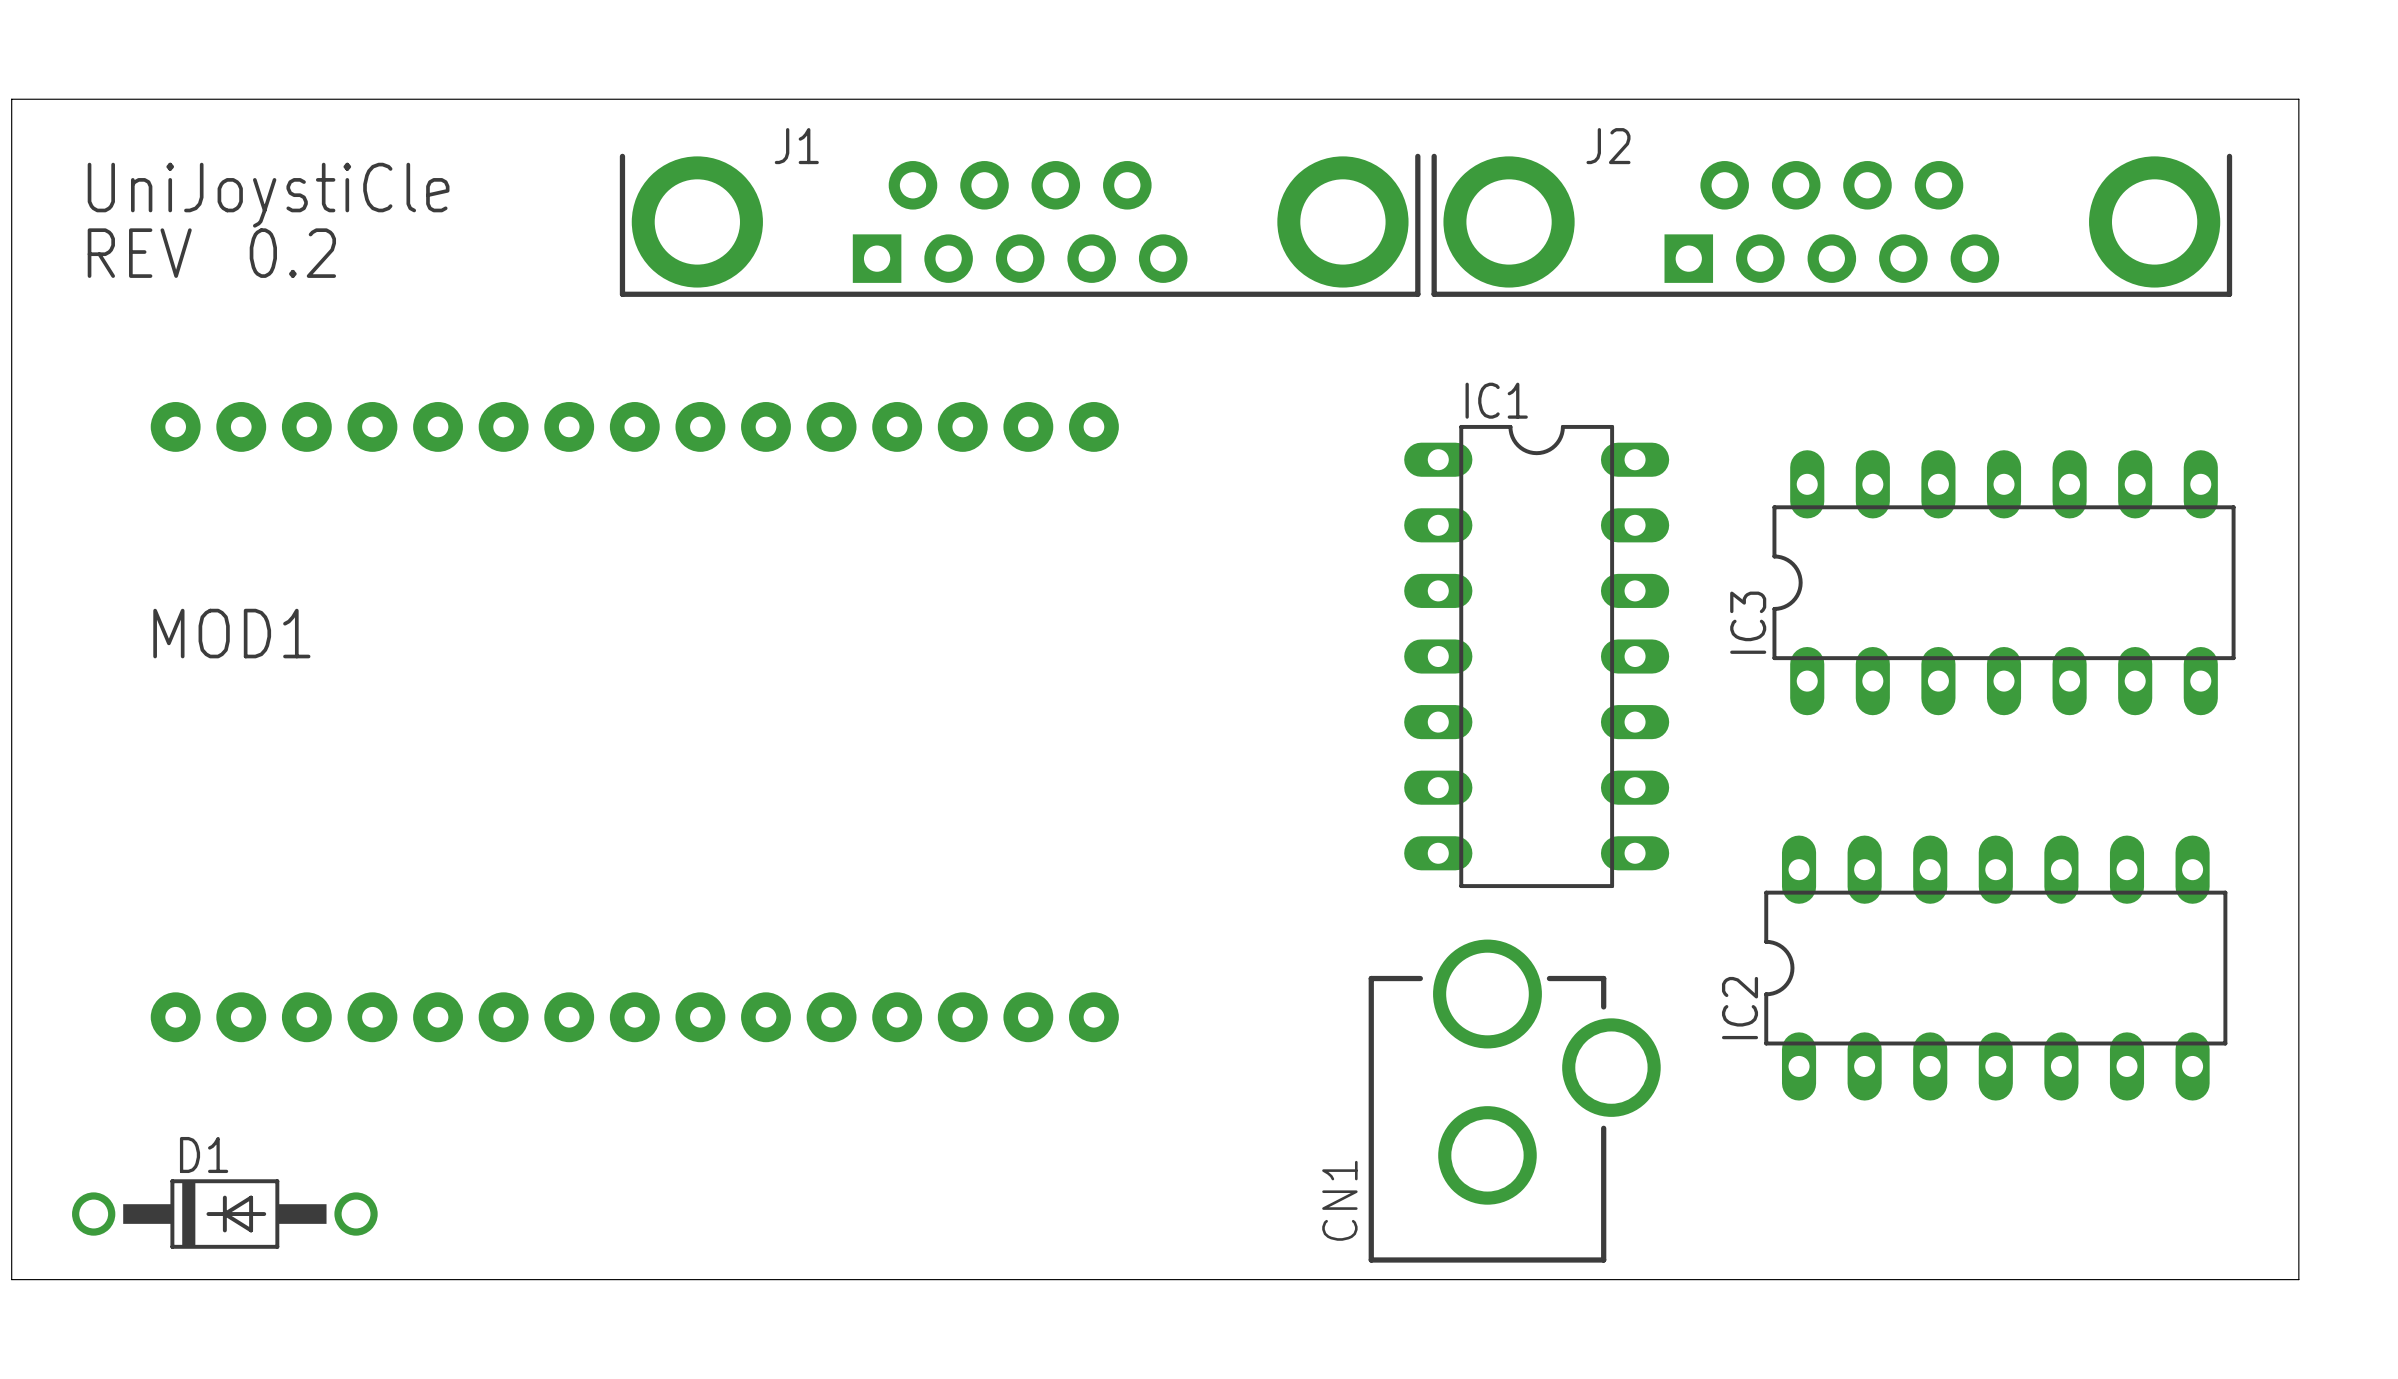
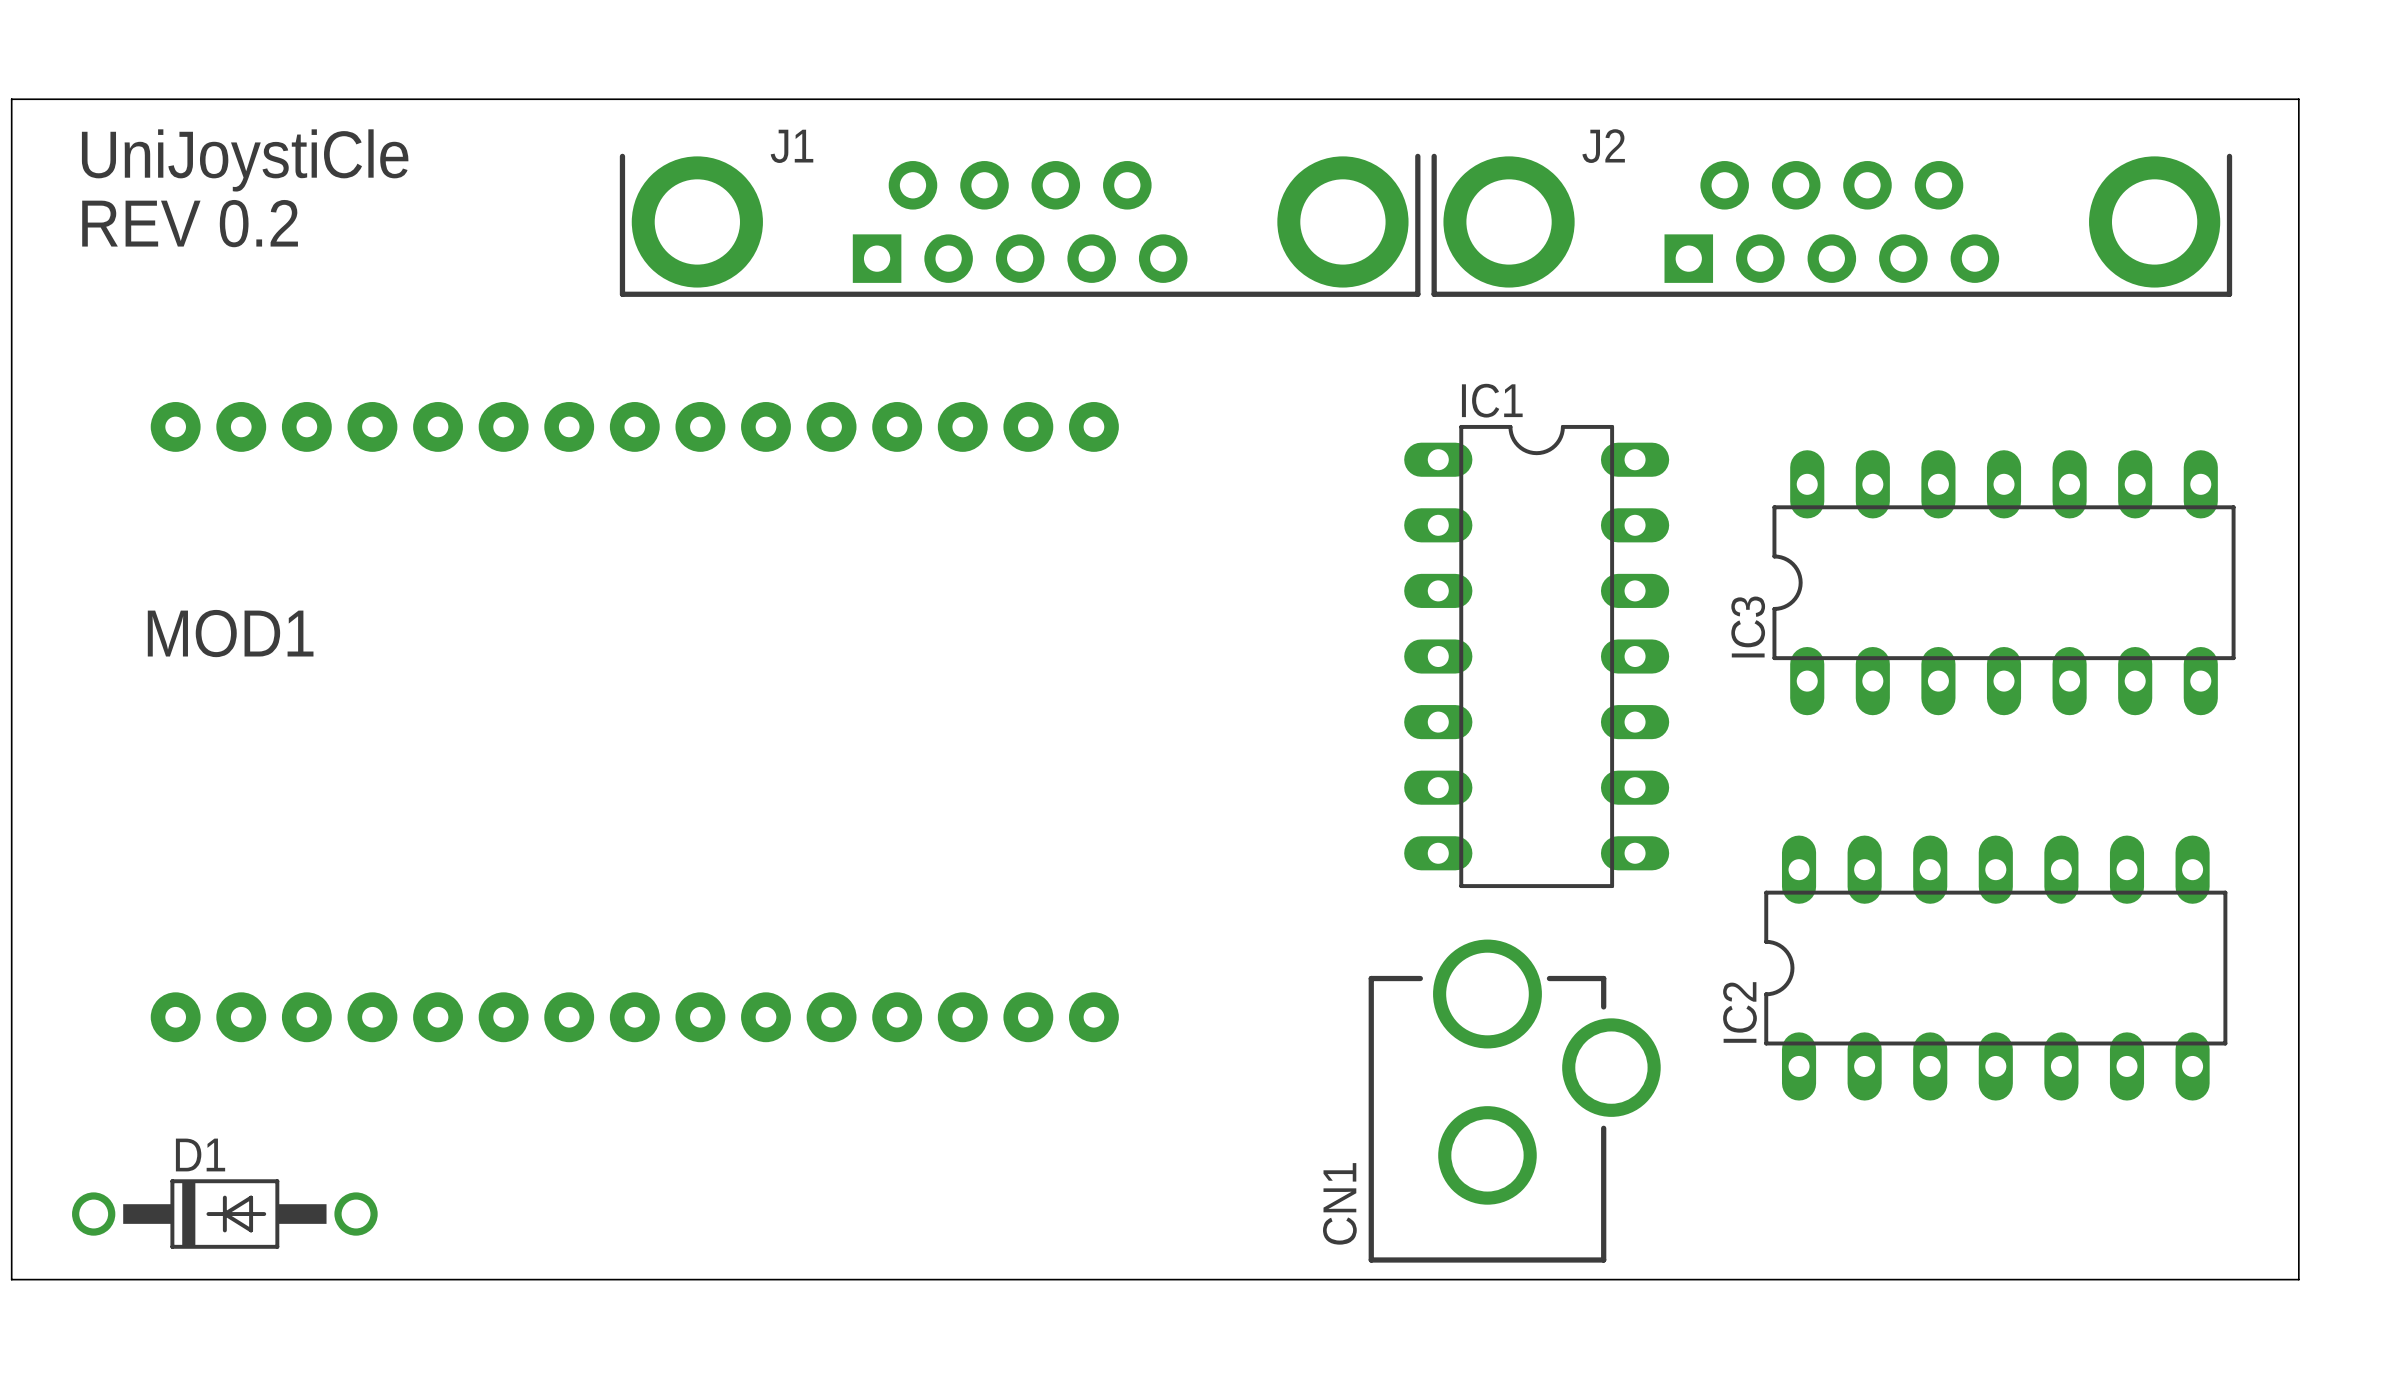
text position: UniJoystiCle (268, 195) -> UniJoystiCle (245, 160)
text: none -> REV 0.2 (190, 223)
text: REV (139, 253) -> none
text: 0.2 (292, 253) -> none

